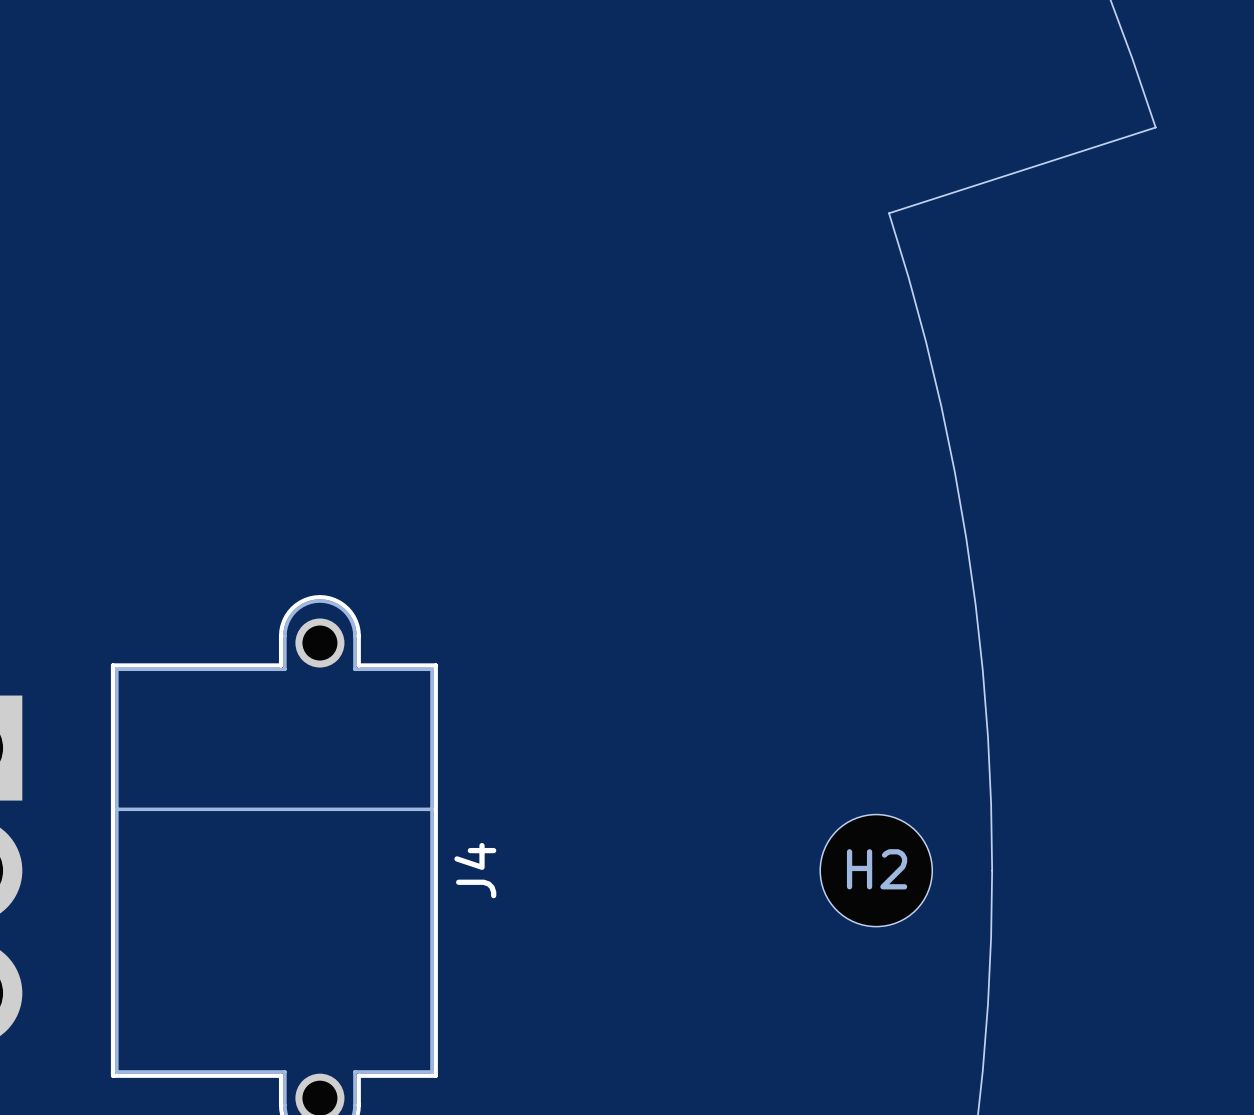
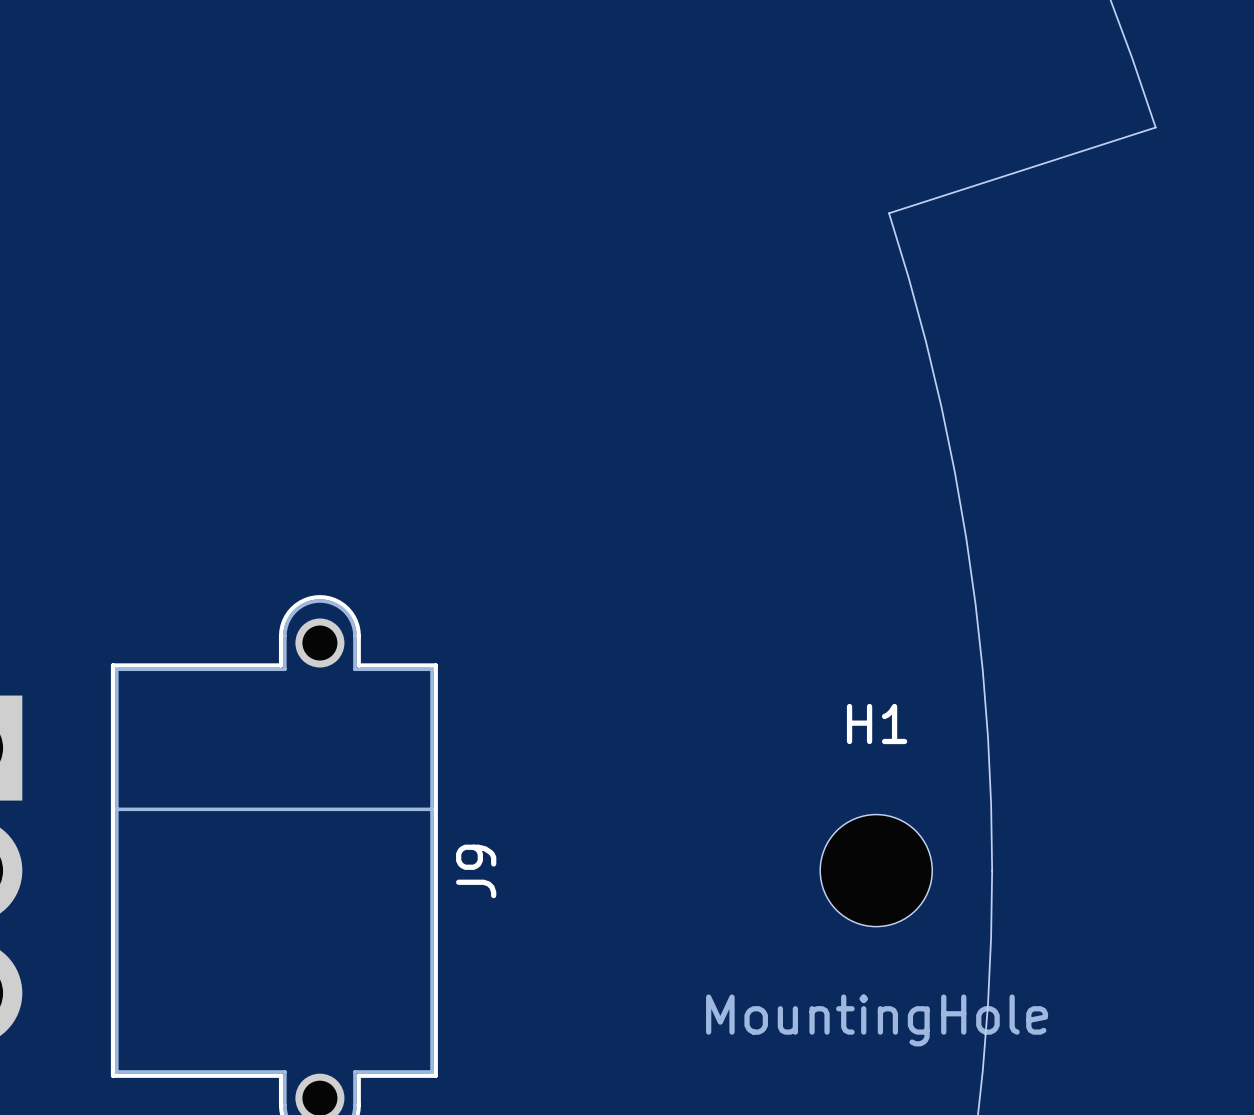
H2 name: H2 (877, 869) -> H1 (877, 723)
J4 name: J4 (475, 870) -> J9 (476, 871)
H2 value: none -> MountingHole (877, 1020)

